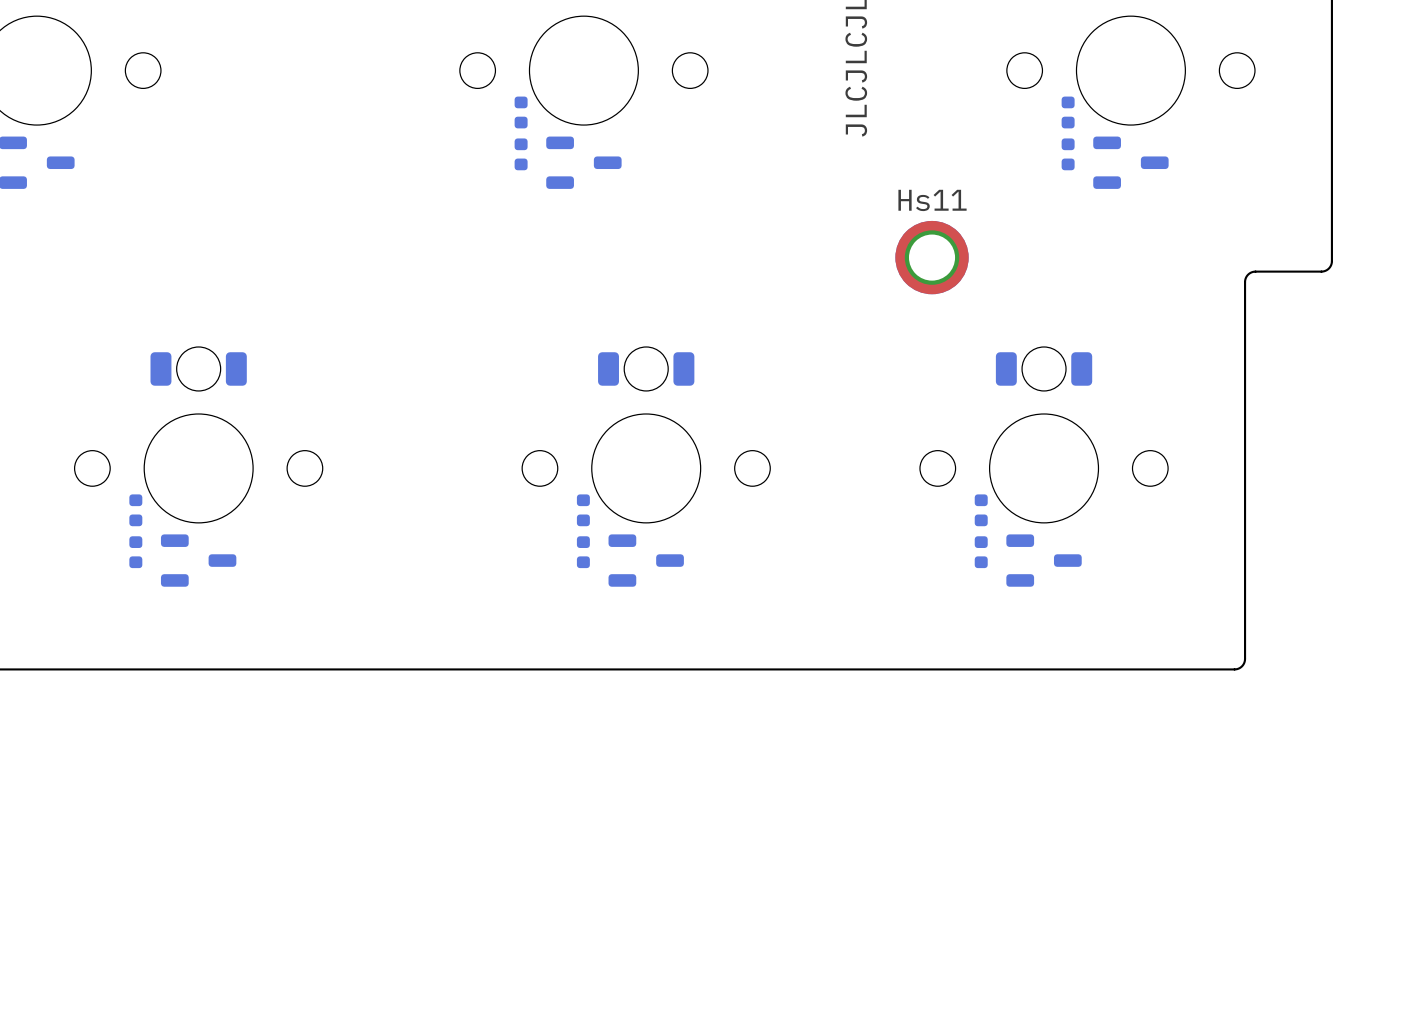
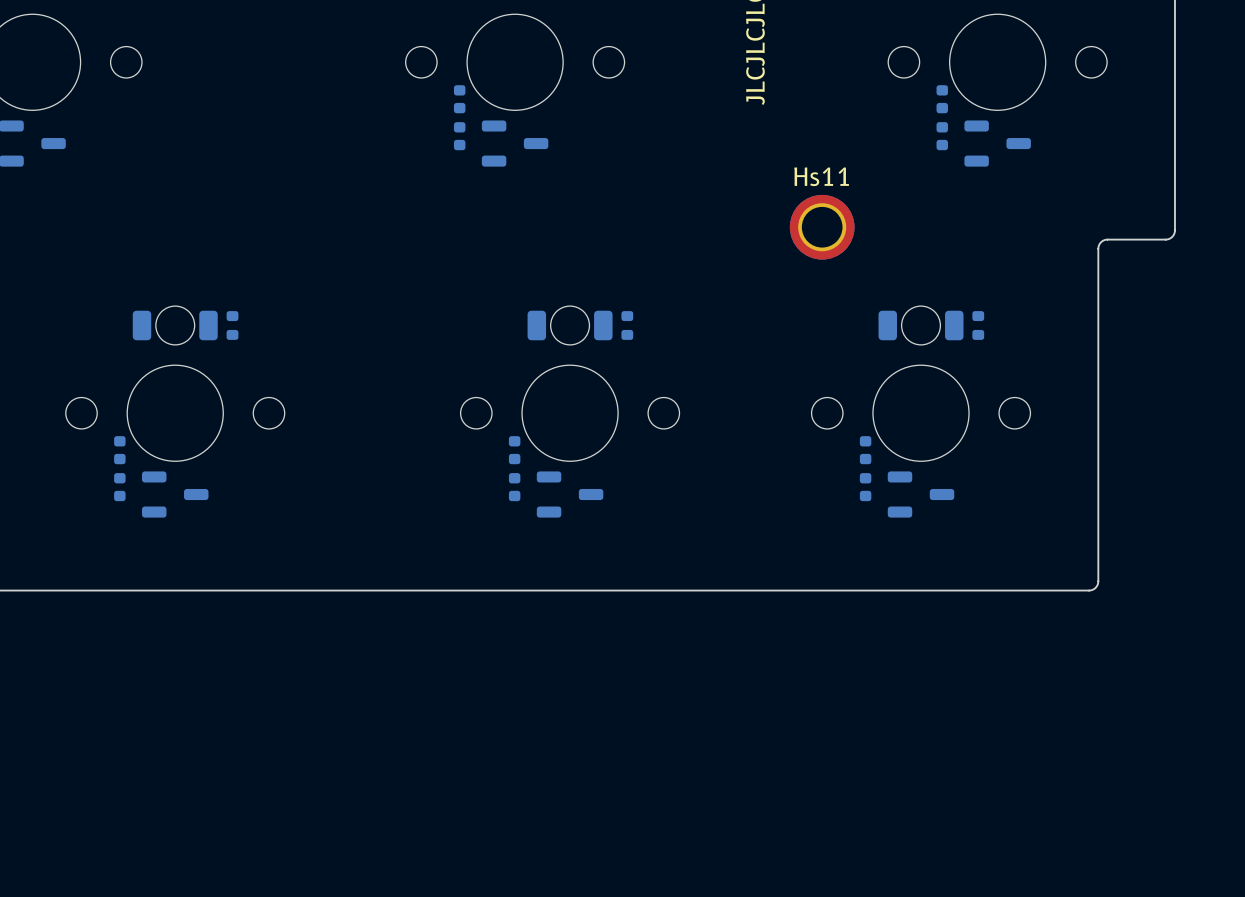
part: none -> (232, 325)
part: none -> (627, 325)
part: none -> (978, 325)

